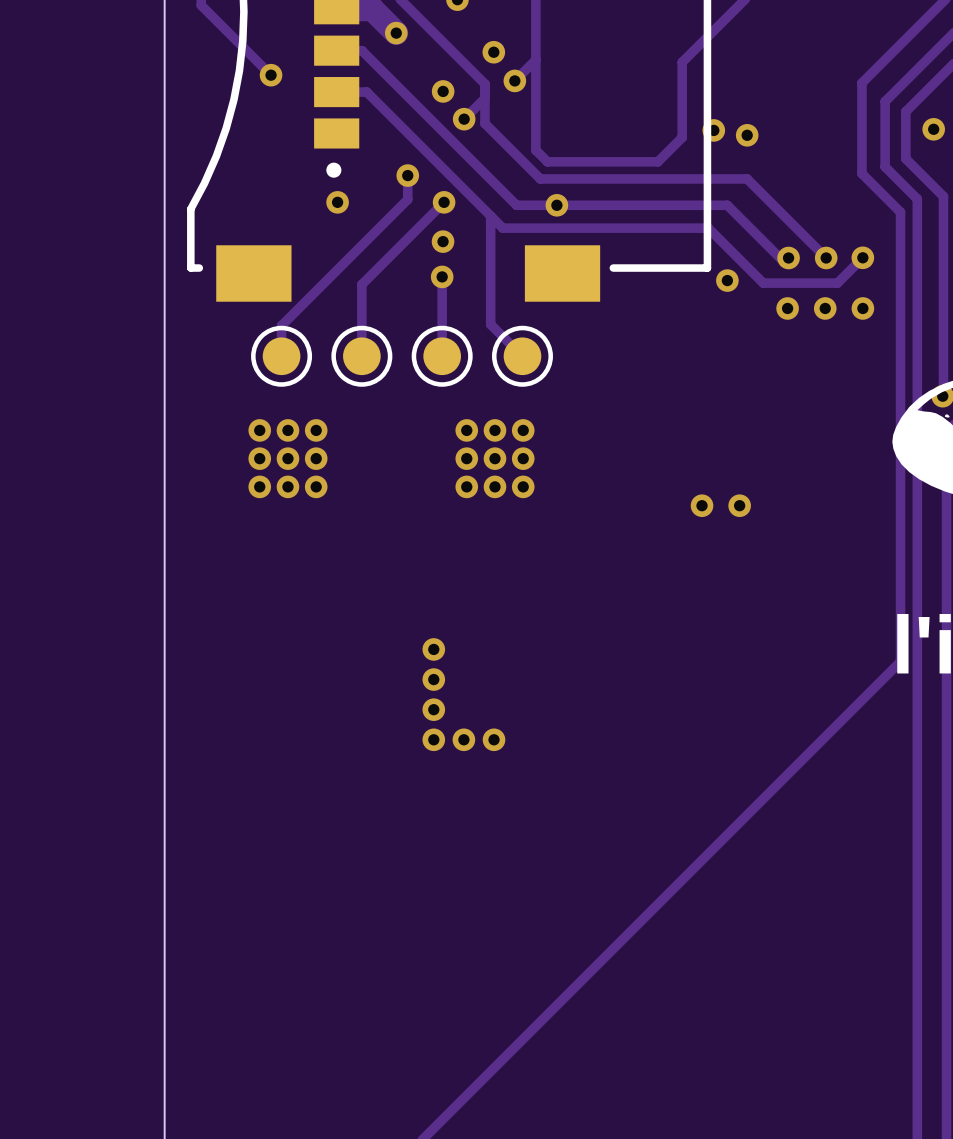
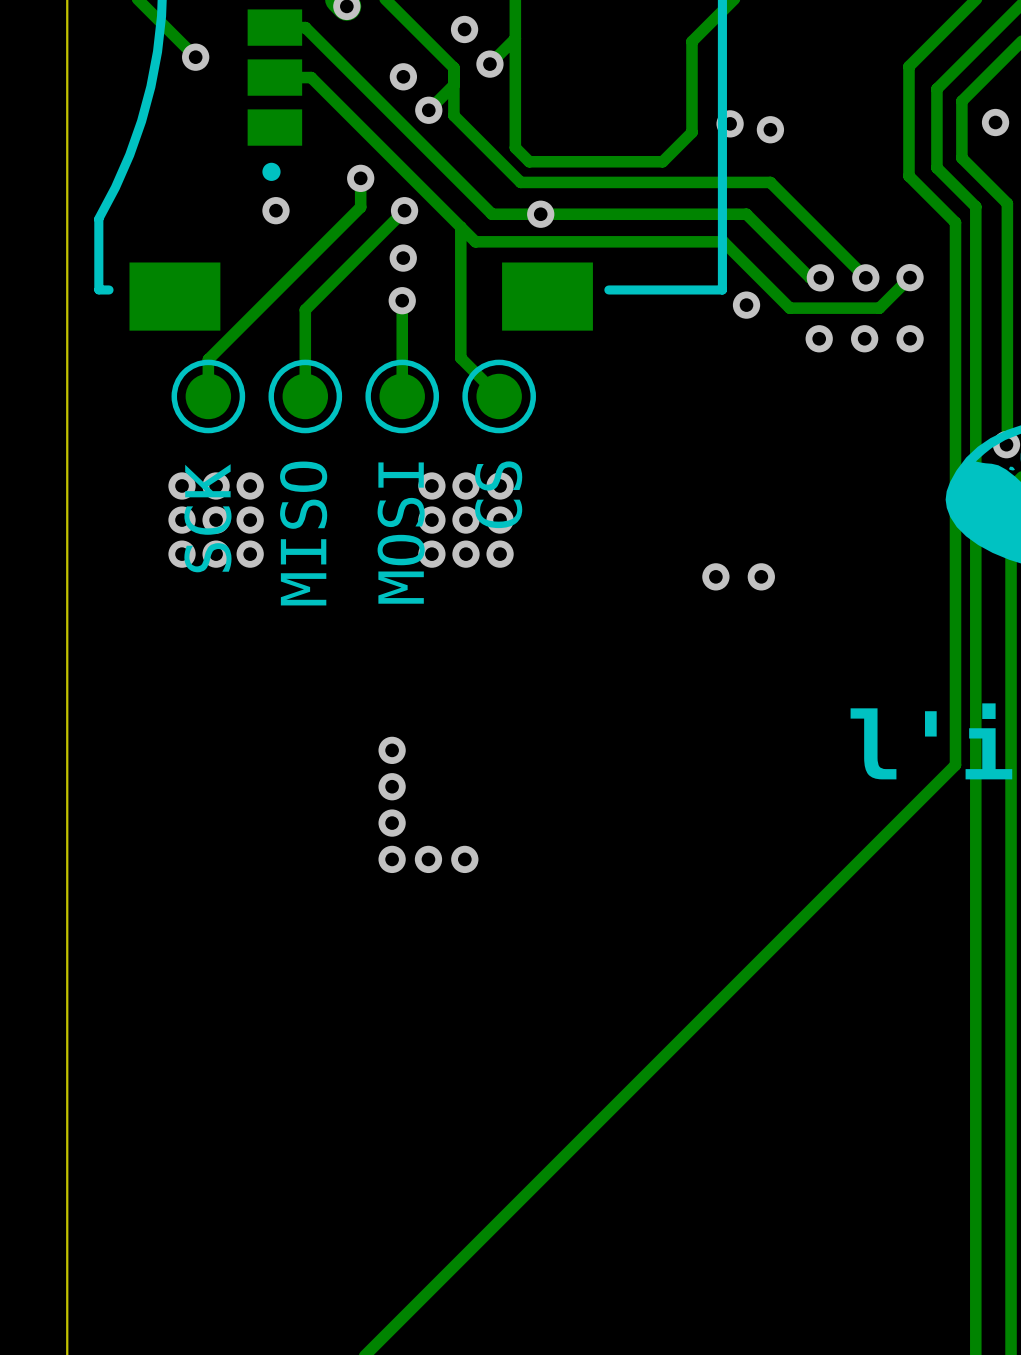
text: none -> CS (498, 494)
text: none -> SCK (207, 518)
text: none -> MISO (303, 533)
text: none -> MOSI (401, 533)

